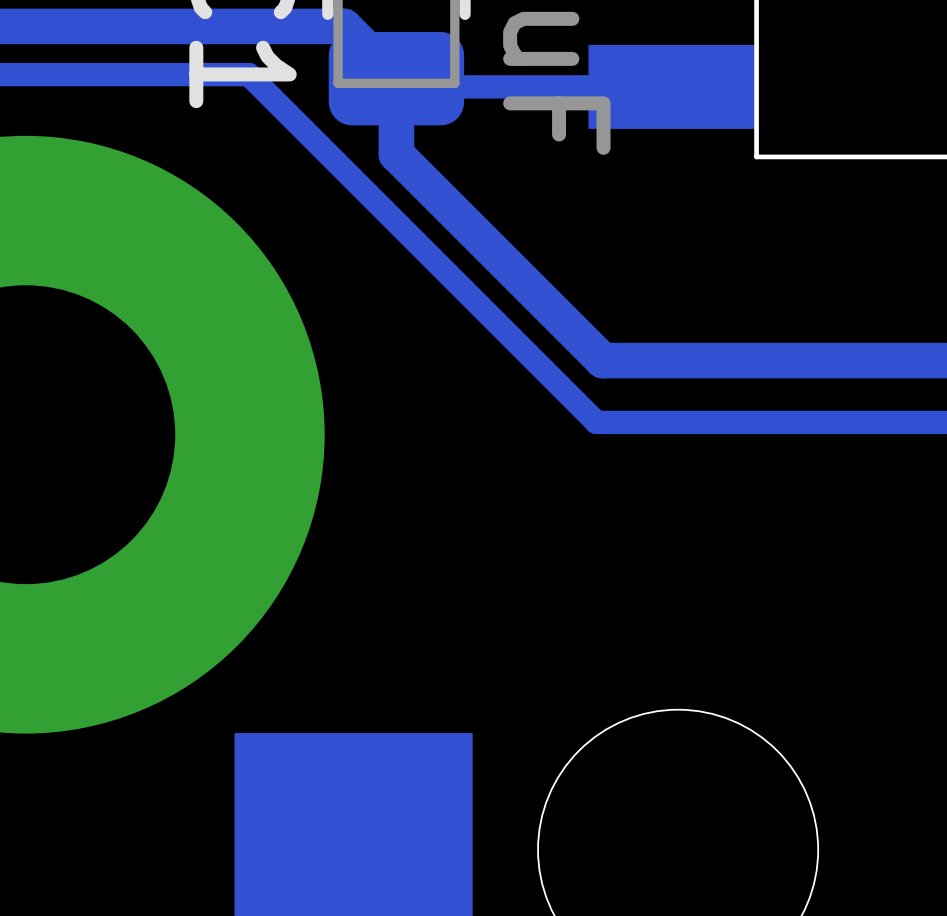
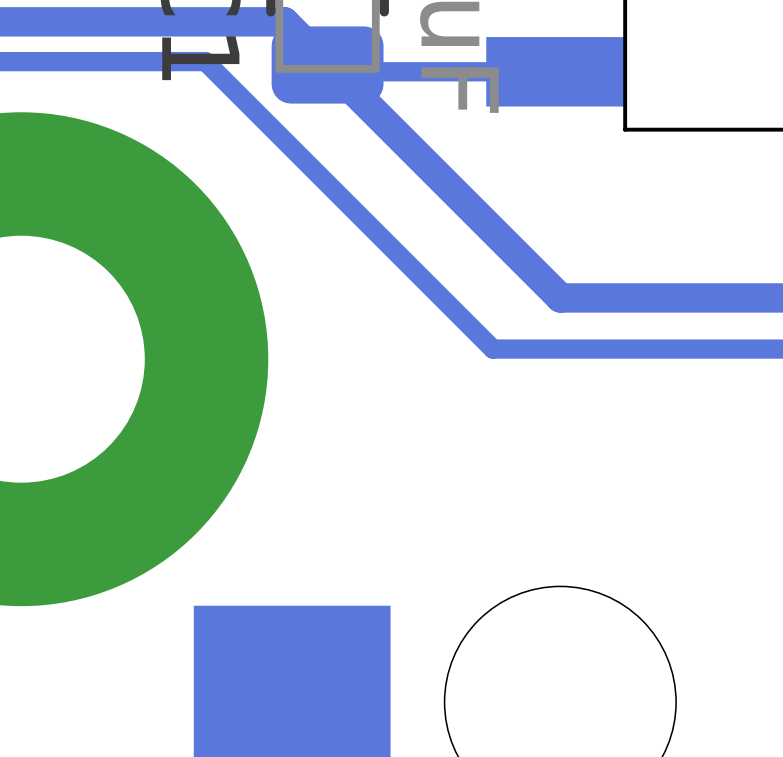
bottom track: (396, 78) (396, 154) (602, 360) (678, 360) -> (327, 65) (560, 297)

